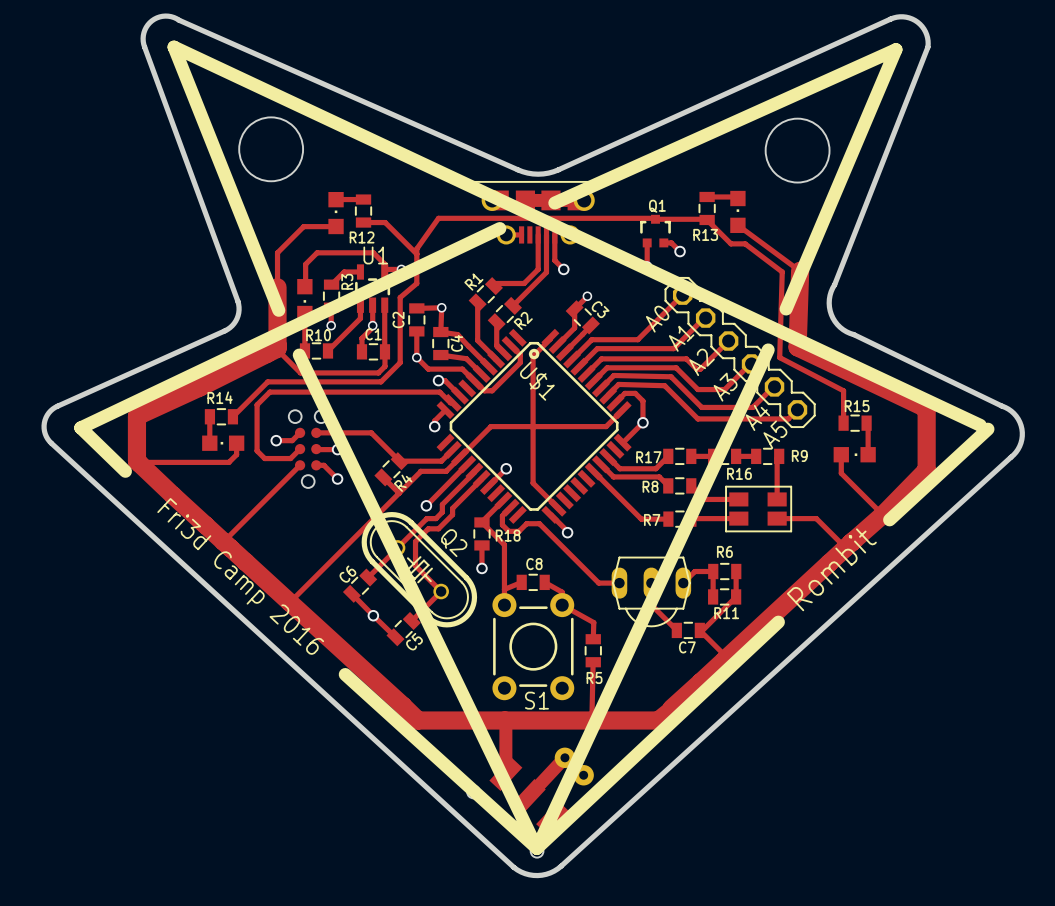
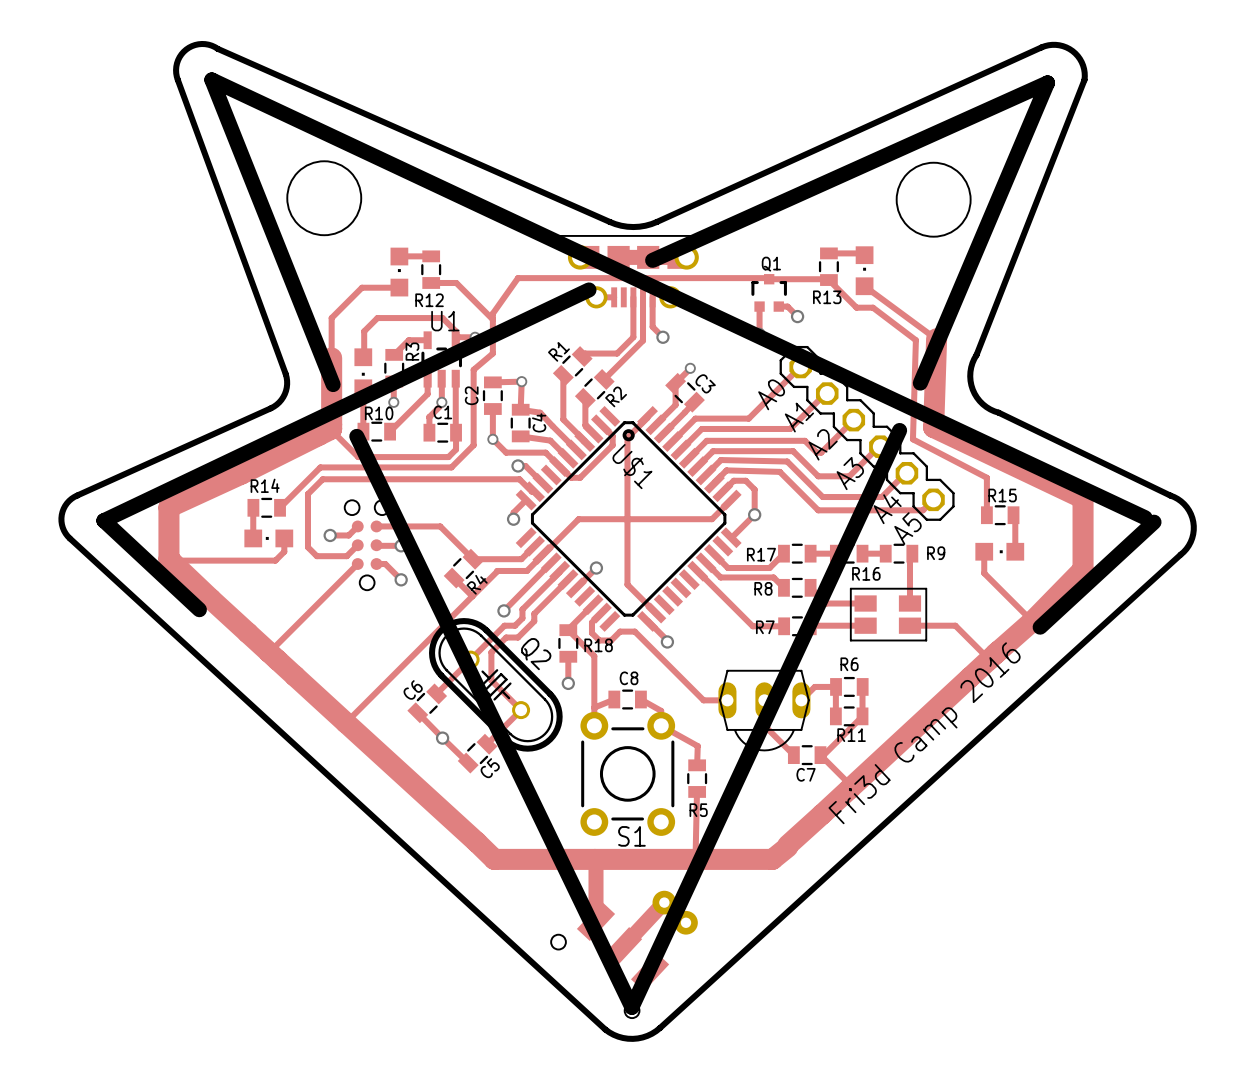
line: (80, 427) (125, 471) -> (103, 520) (199, 609)
text: Rombit (831, 569) -> none
text: Fri3d Camp 2016 (240, 576) -> none
text: none -> Fri3d Camp 2016 (924, 733)
line: (778, 622) (536, 848) (345, 674) -> none

